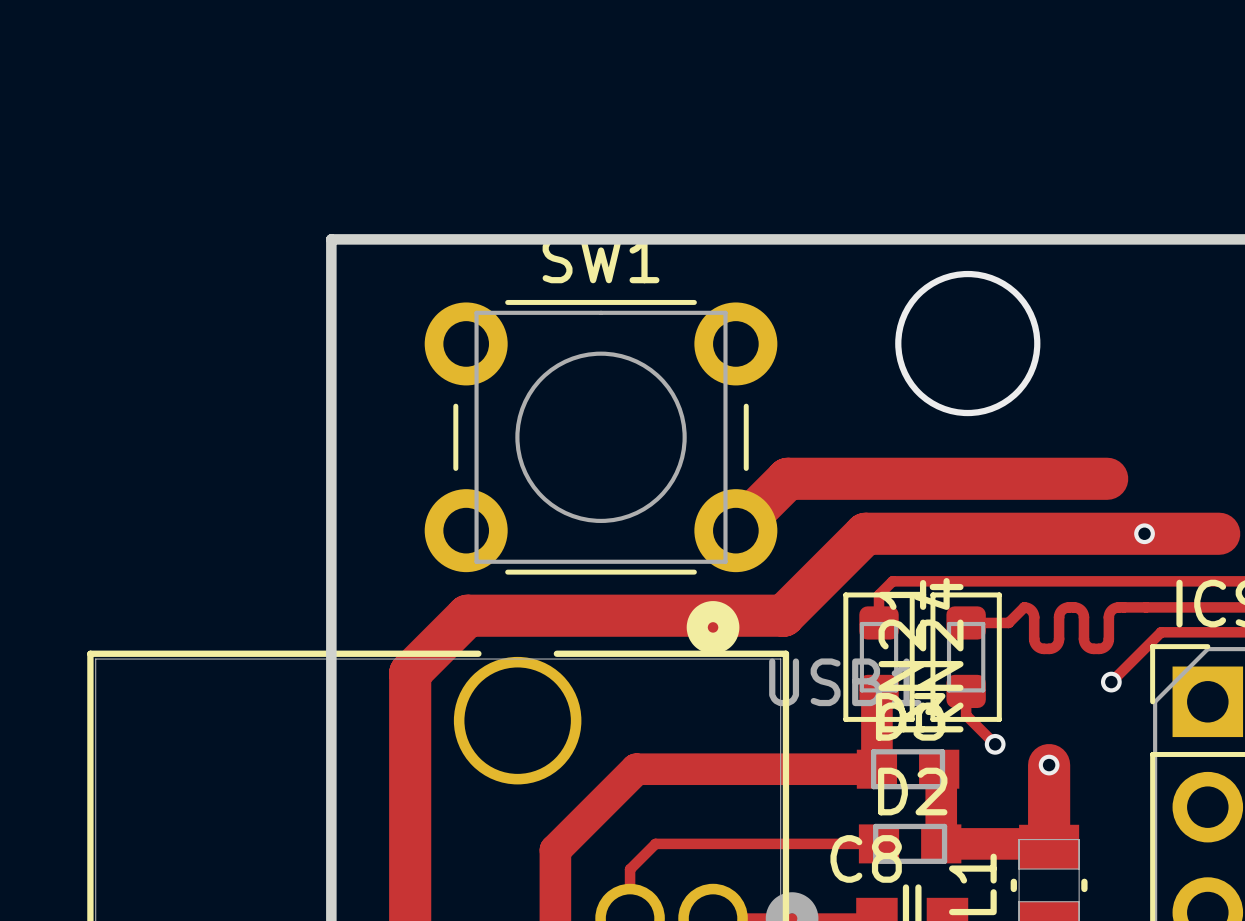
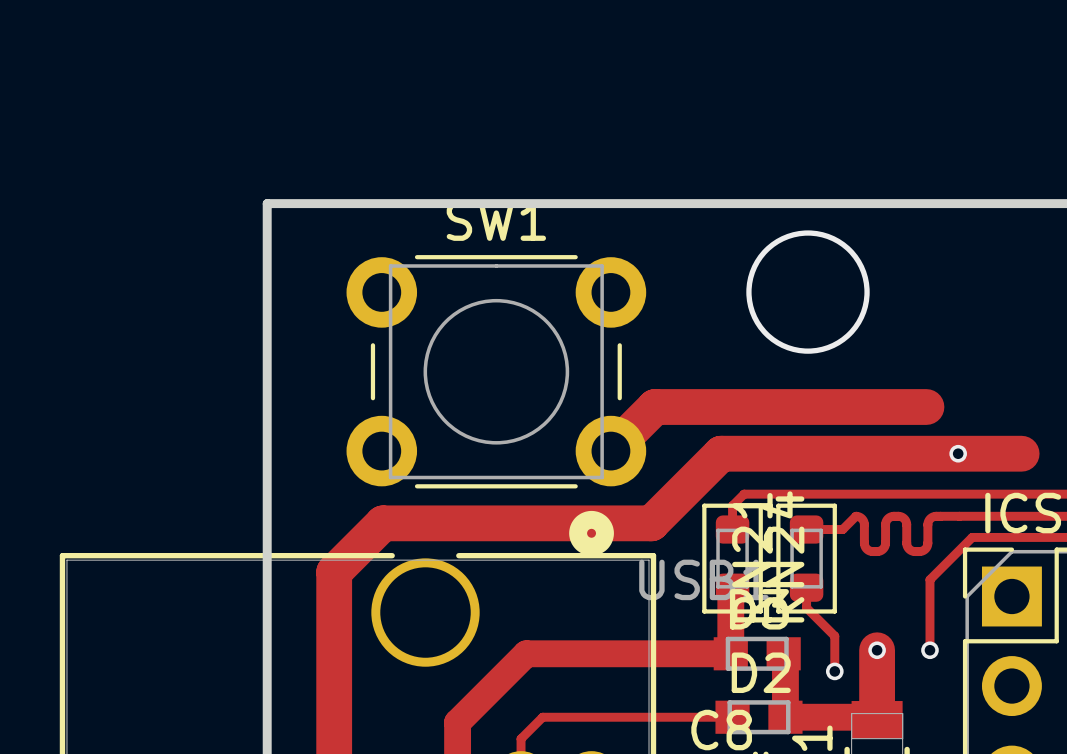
track: none -> (929, 579) (929, 650)
via: (1111, 682) -> none
track: none -> (831, 632) (834, 636) (834, 671)
via position: (995, 744) -> (834, 671)
via: none -> (929, 650)

